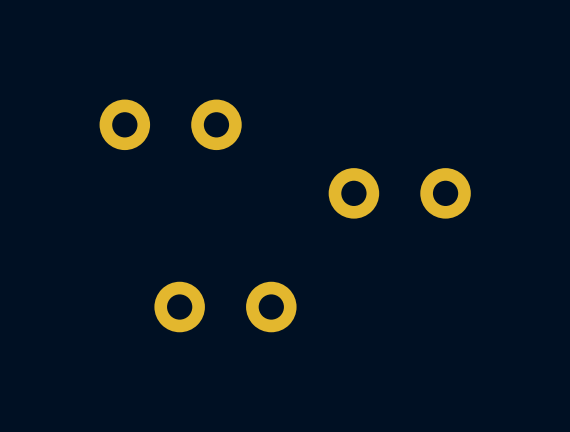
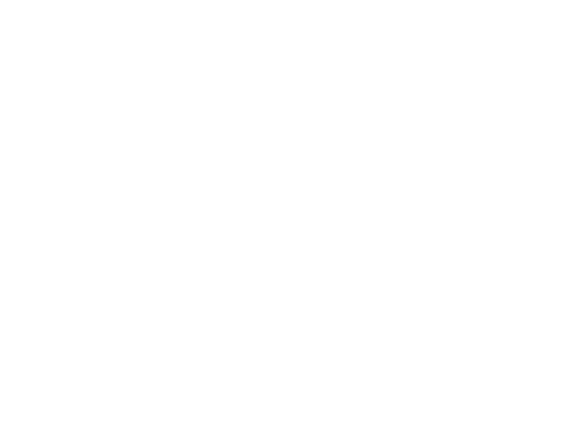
part: (170, 124) -> none
part: (399, 193) -> none
part: (225, 307) -> none

